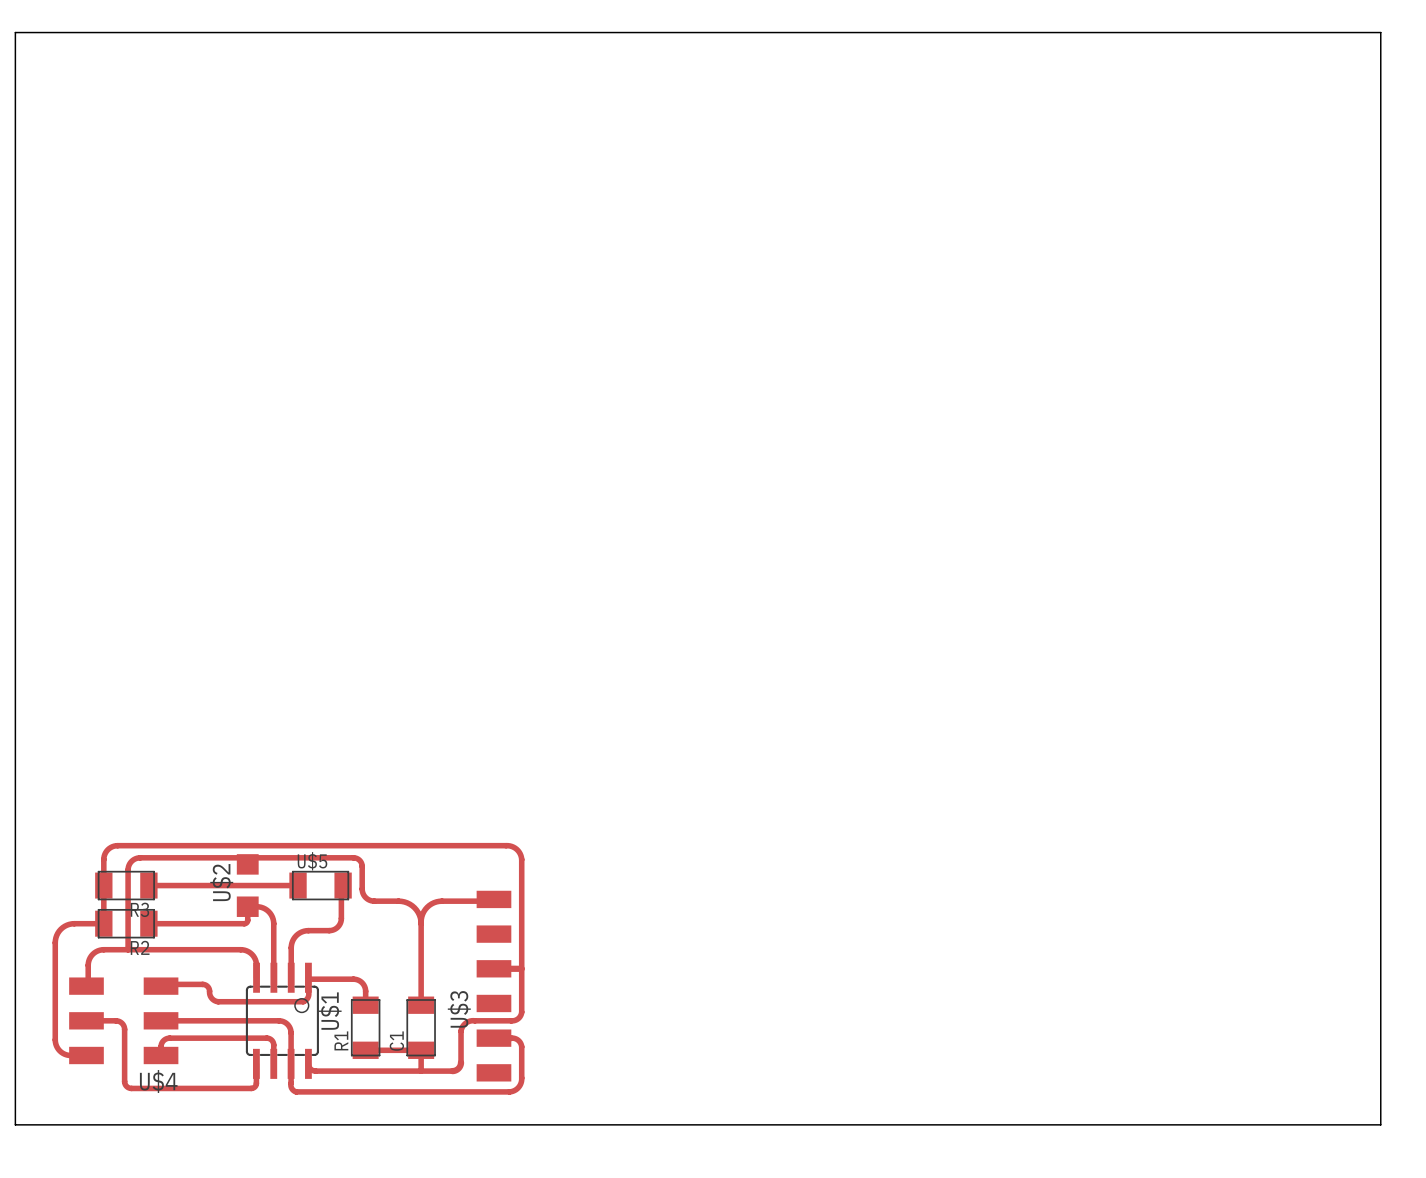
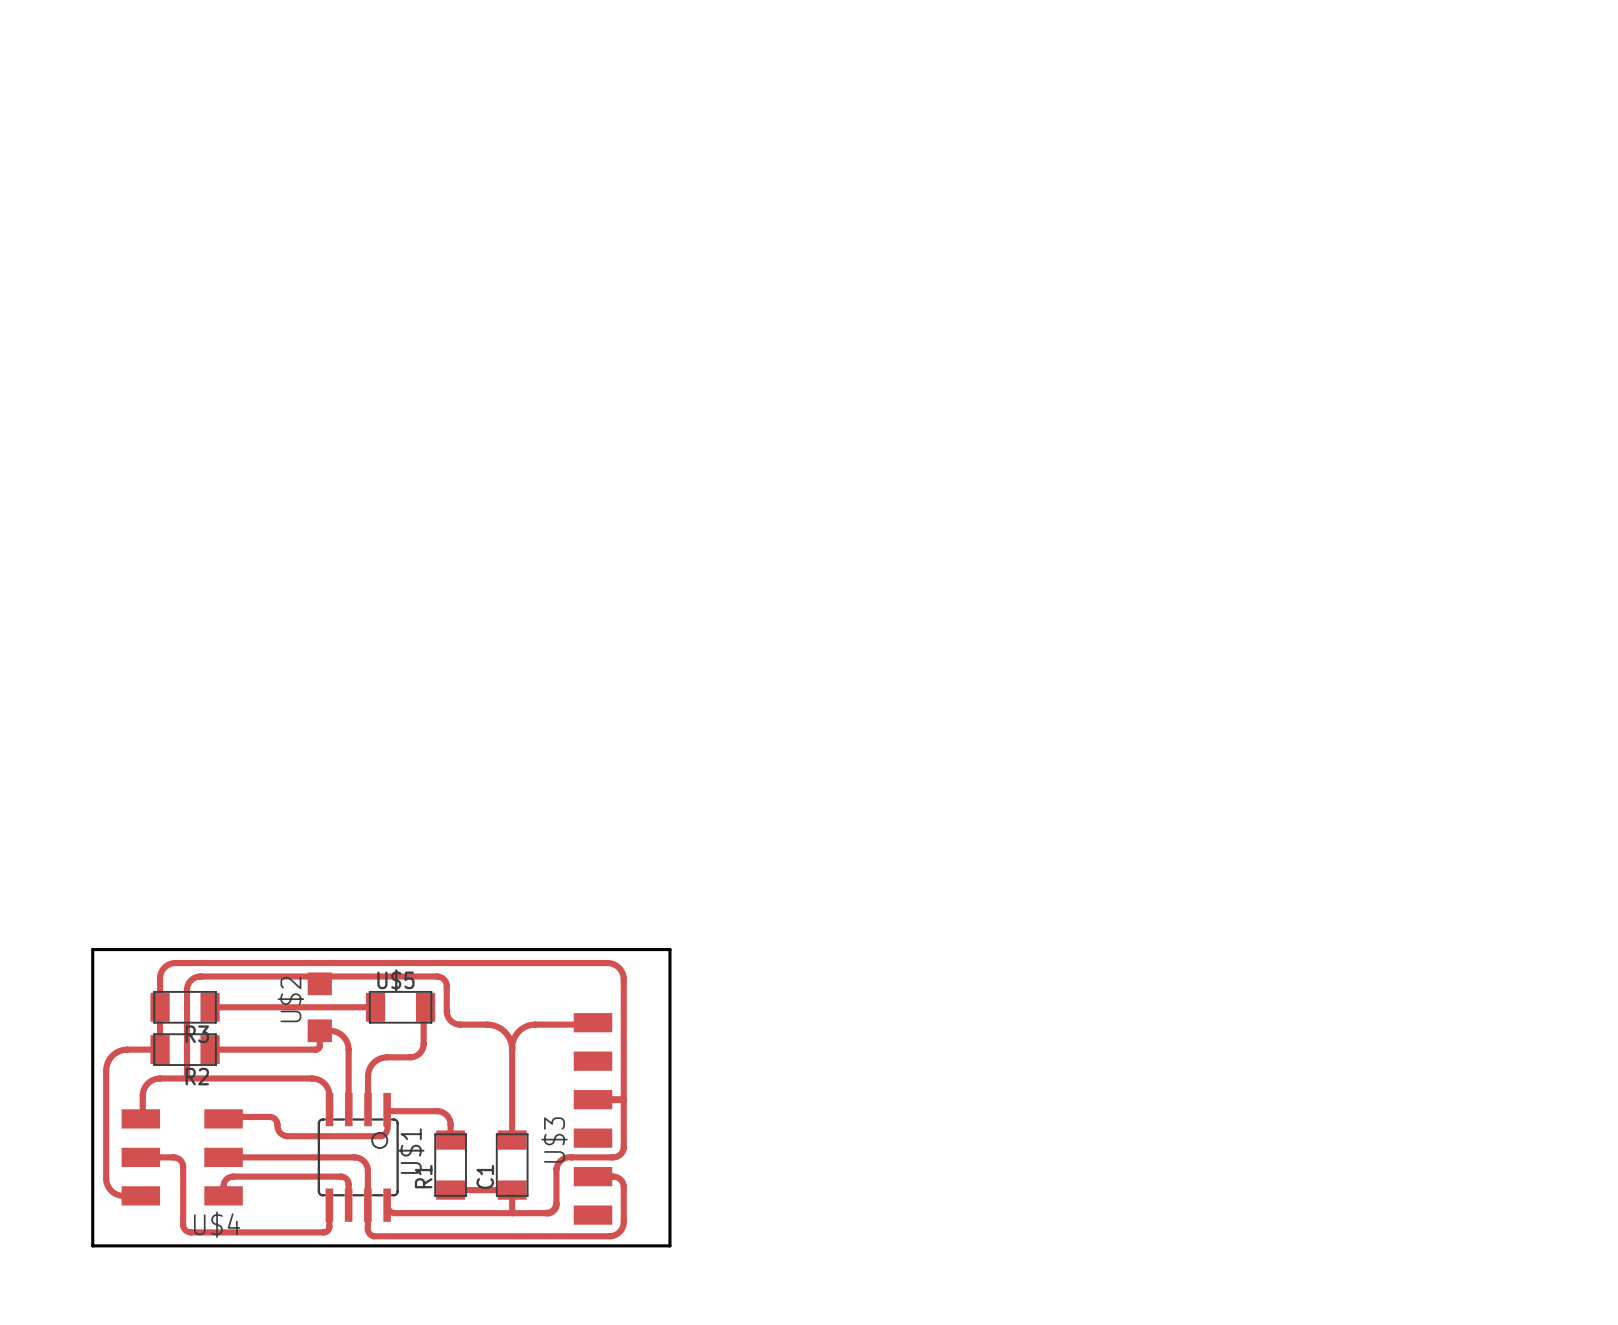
board edge: (15, 32) (1380, 32) (1380, 1124) (15, 1124) (15, 32) -> none
board edge: none -> (92, 949) (669, 949) (669, 1245) (92, 1245) (92, 949)

